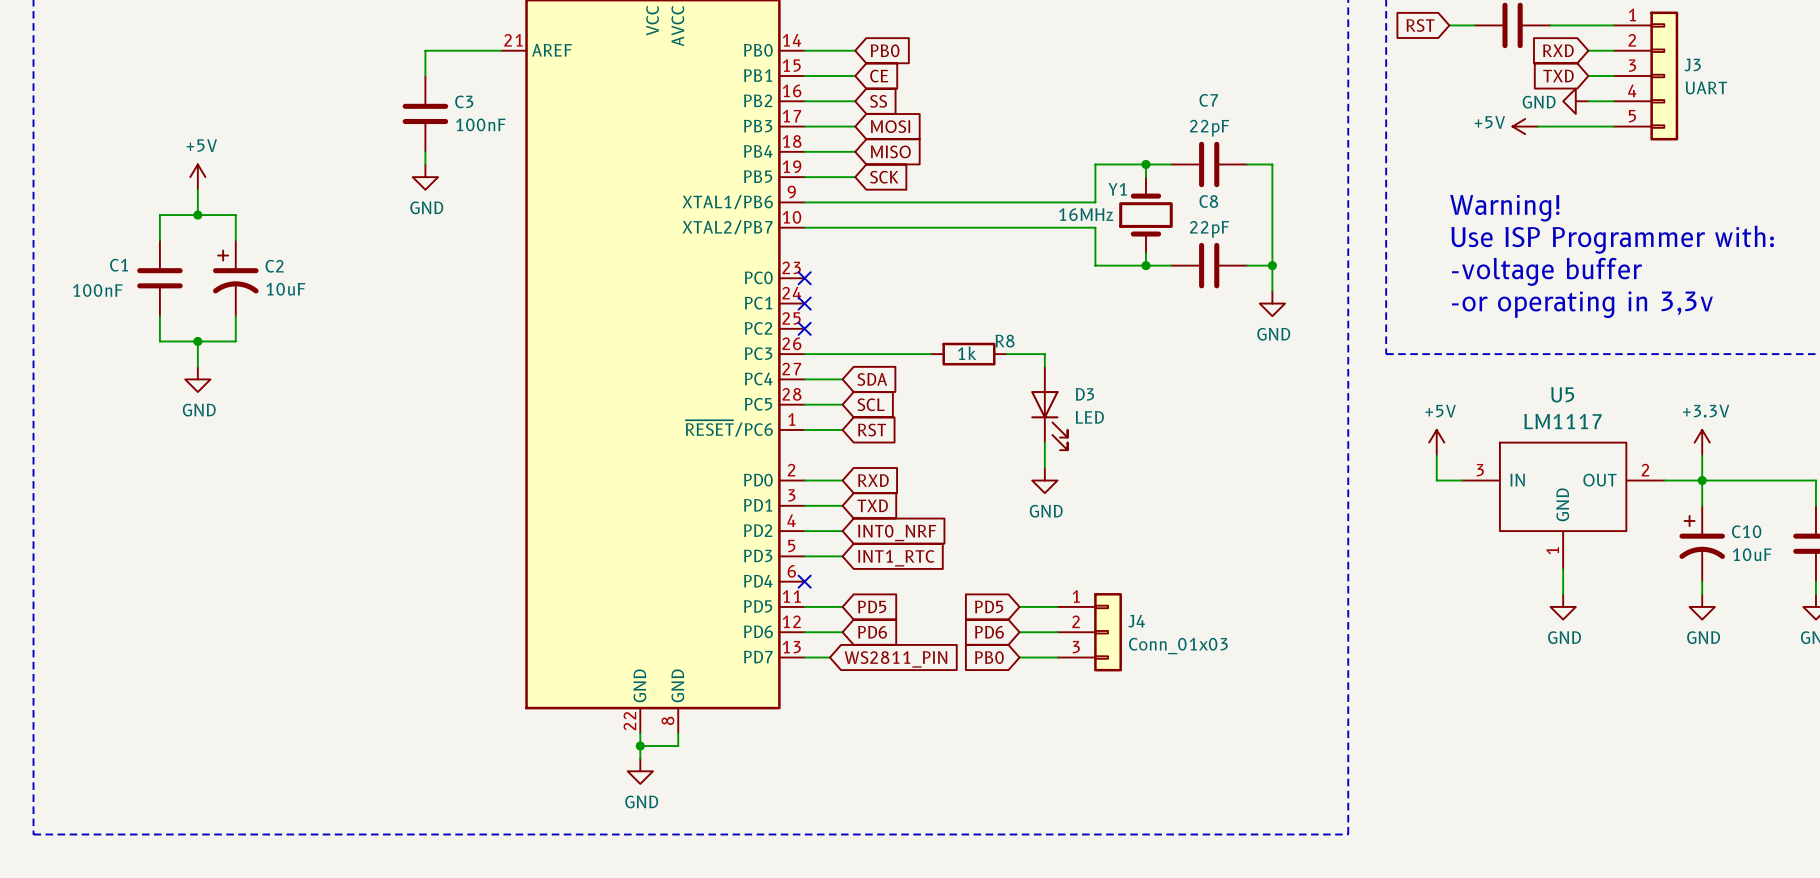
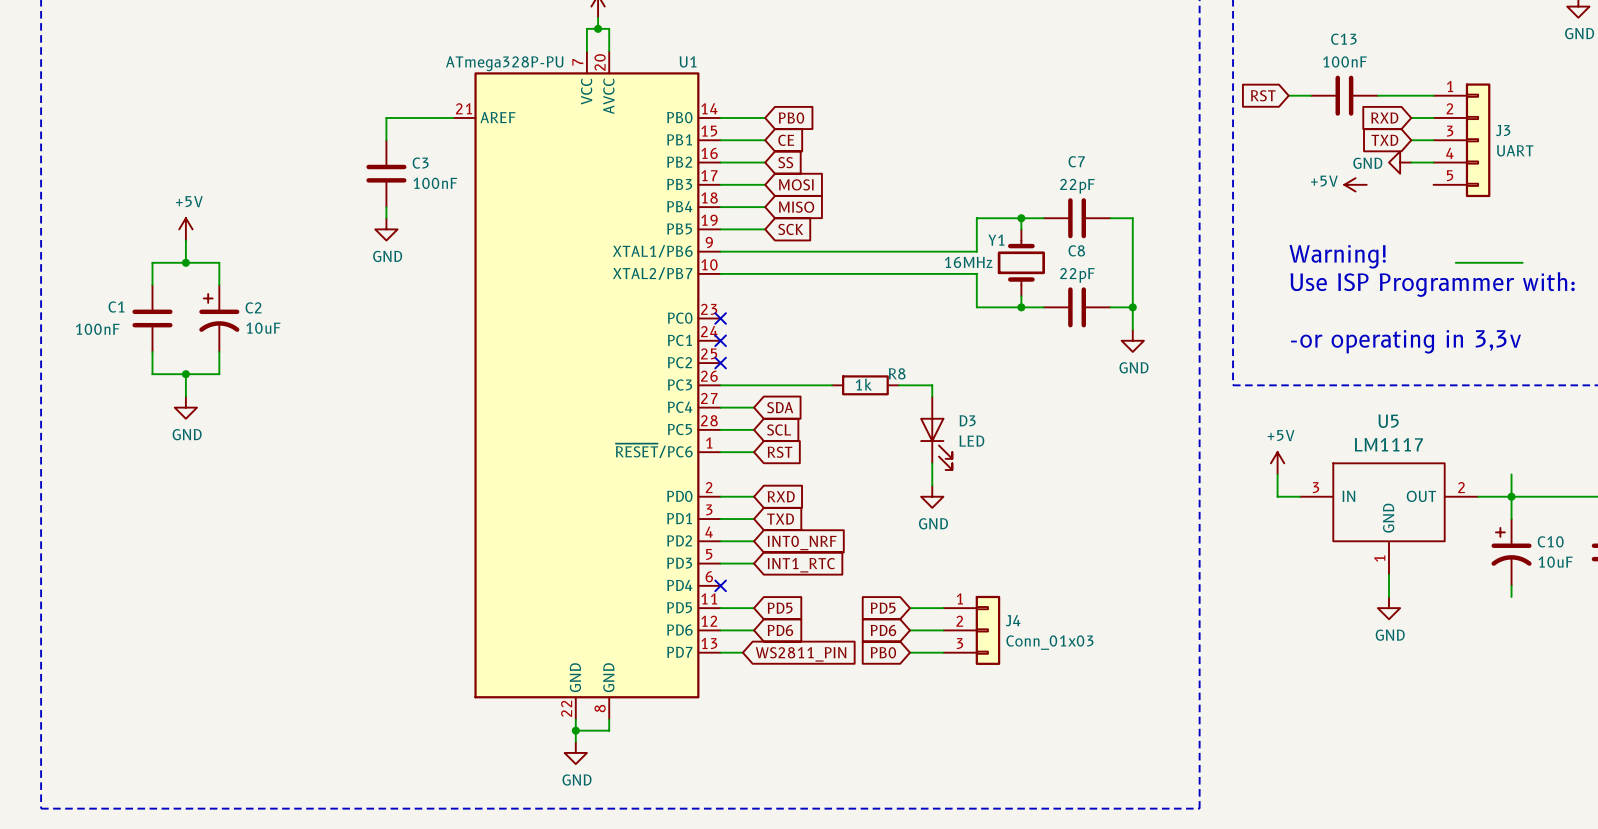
wire: (1537, 126) (1613, 126) -> (1455, 262) (1522, 262)
text: -voltage buffer (1546, 271) -> none
power symbol: +3.3V (1702, 442) -> none
power symbol: GND (1702, 606) -> none

